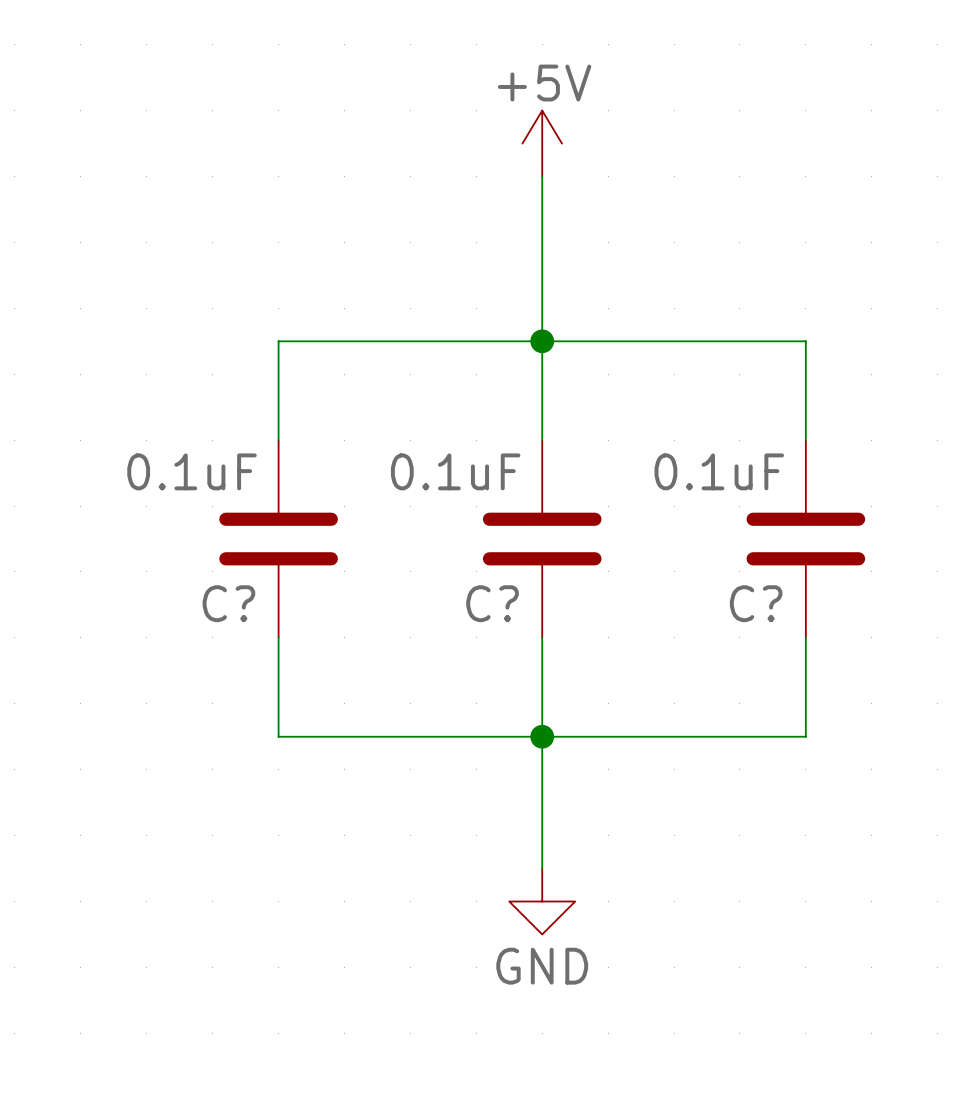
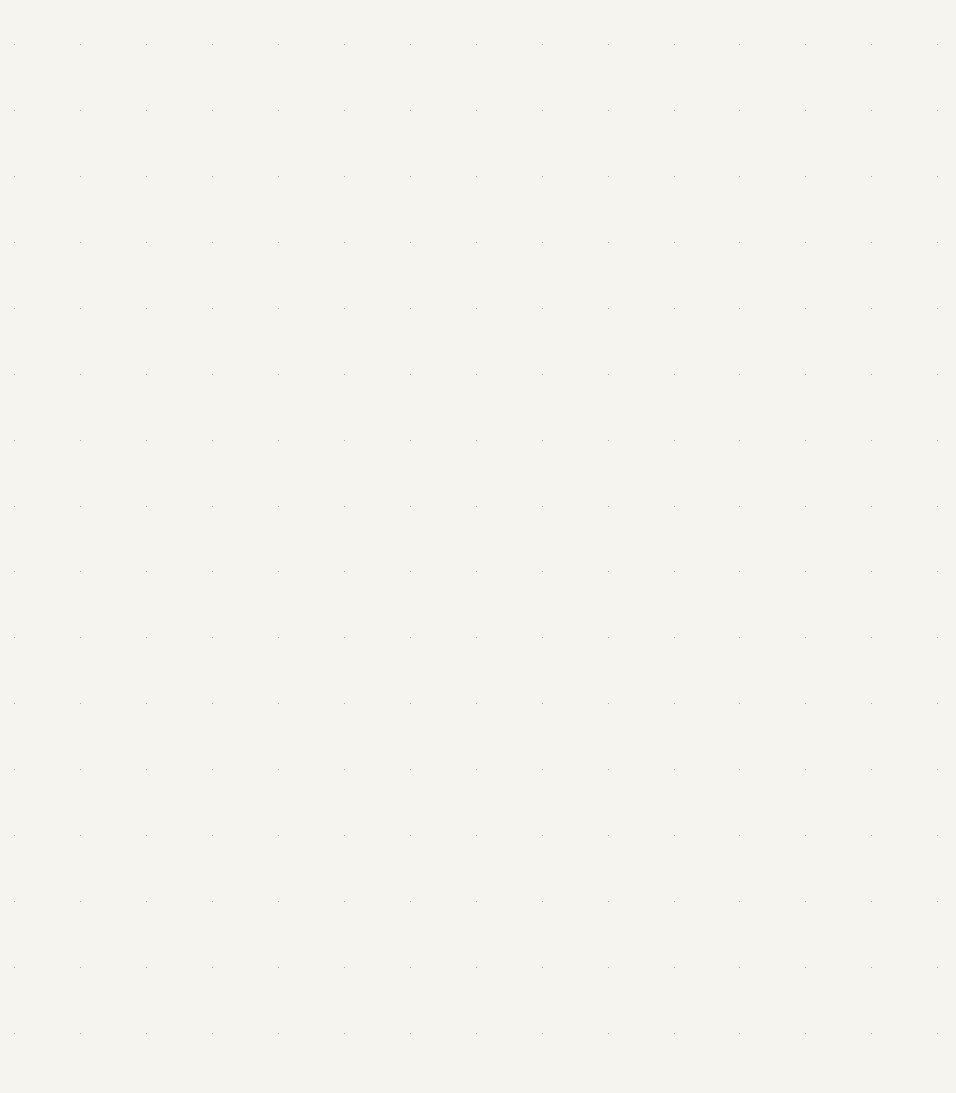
power symbol: +5V (542, 143) -> none
wire: (542, 176) (542, 440) -> none
junction: (542, 341) -> none
wire: (278, 440) (278, 341) (805, 341) (805, 440) -> none
C?: 0.1uF (278, 539) -> none
C?: 0.1uF (542, 539) -> none
C?: 0.1uF (805, 539) -> none
wire: (278, 637) (278, 736) (805, 736) (805, 637) -> none
wire: (542, 637) (542, 868) -> none
junction: (542, 736) -> none
power symbol: GND (542, 901) -> none

